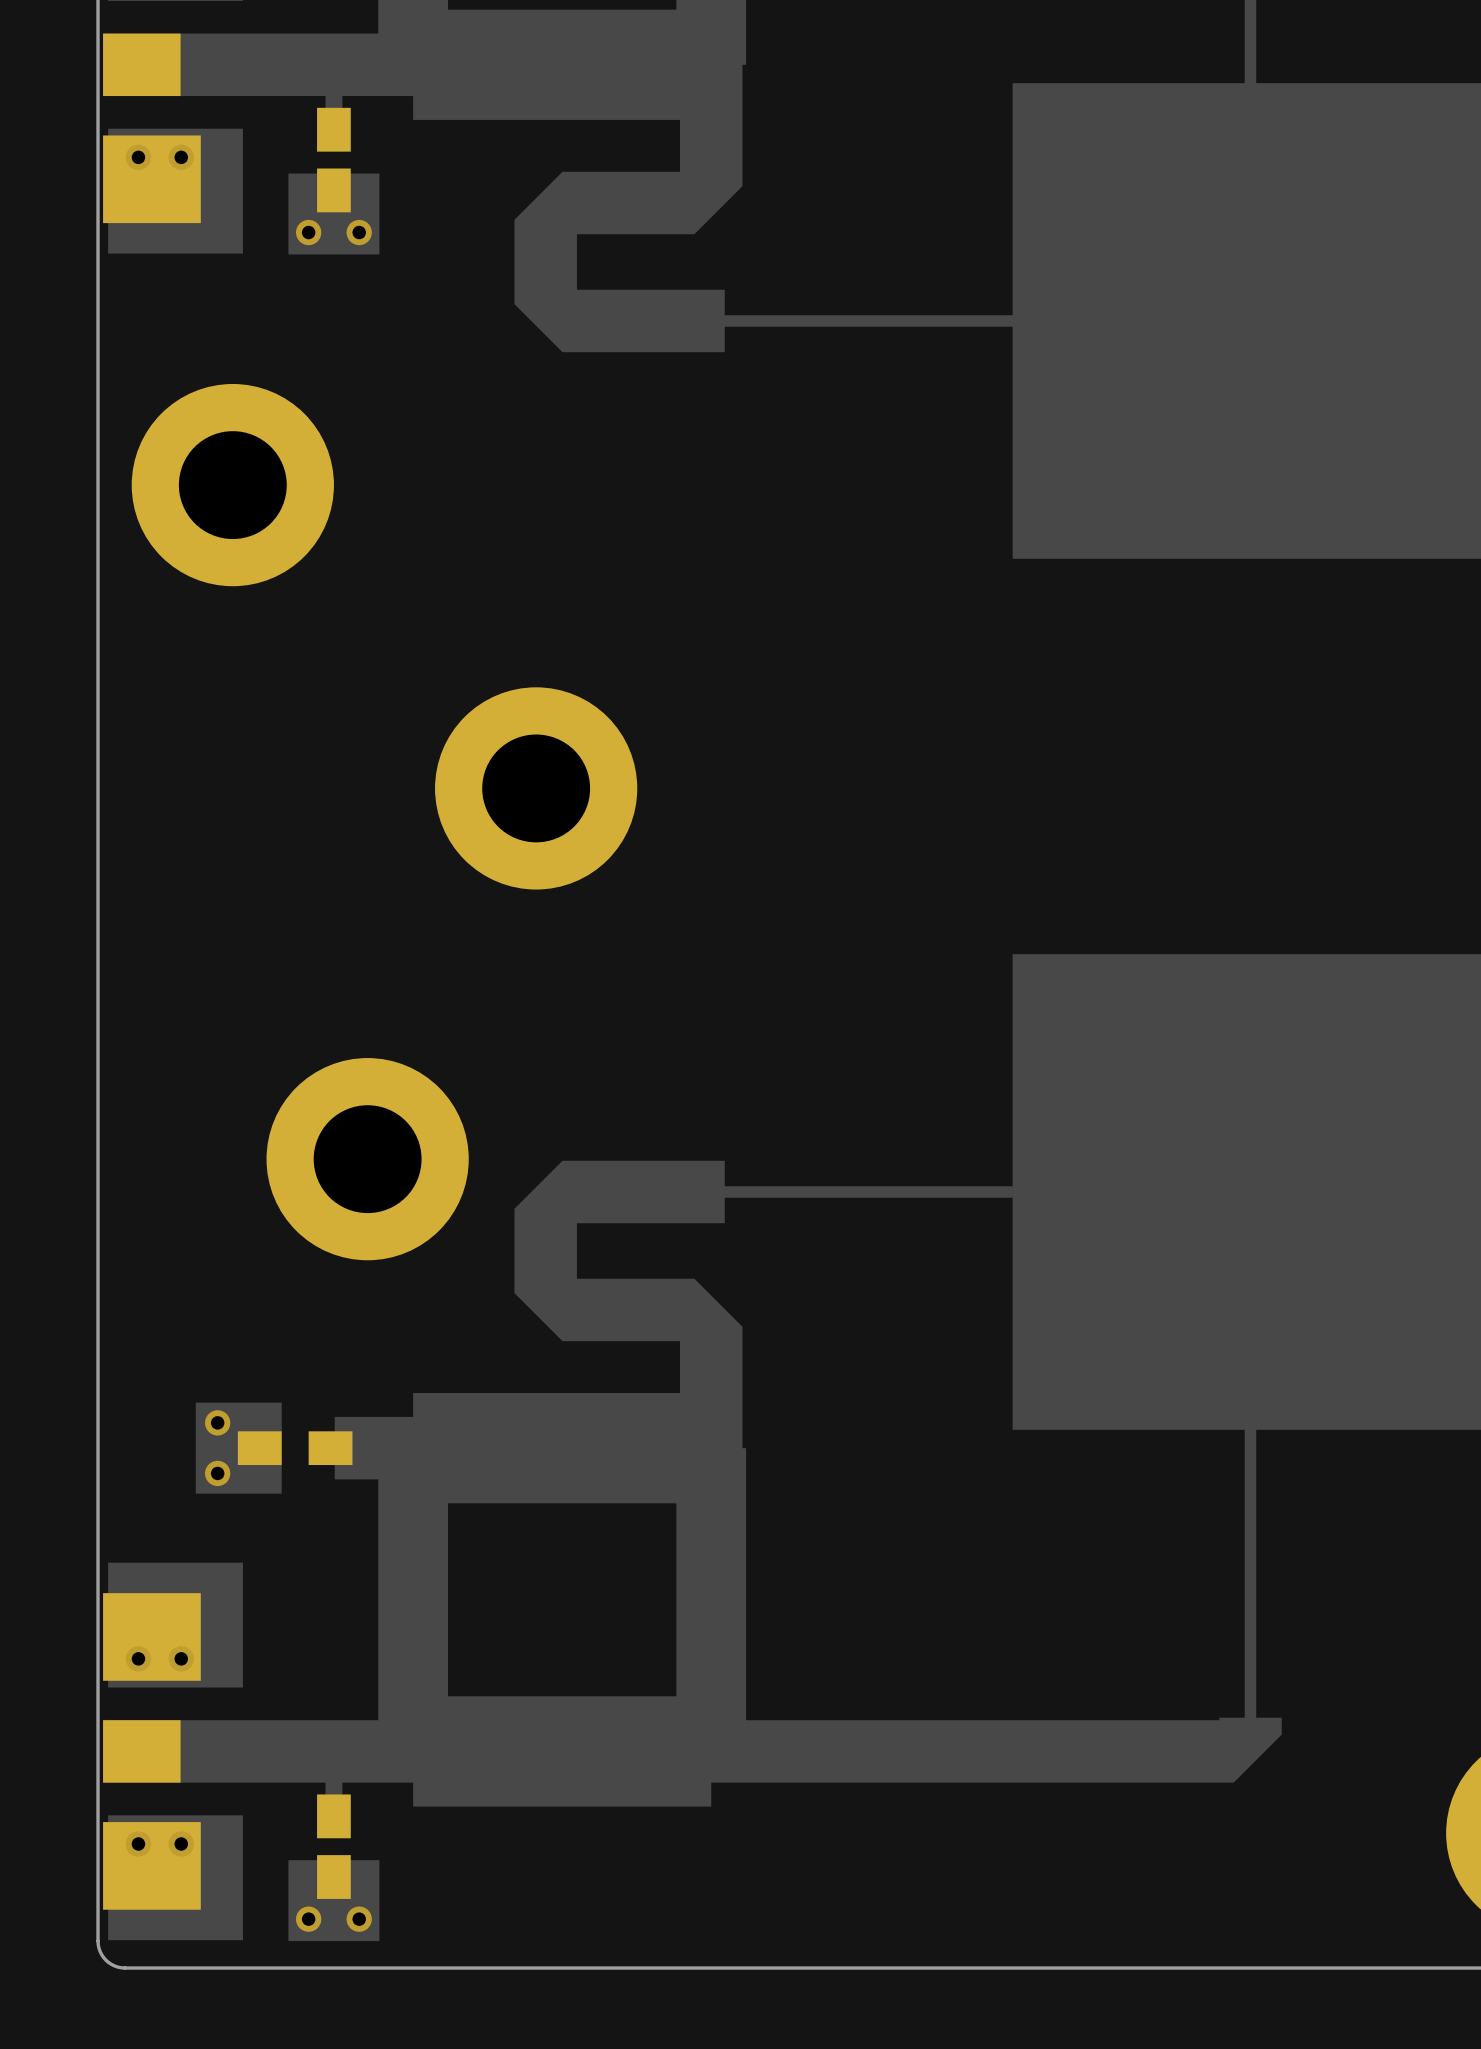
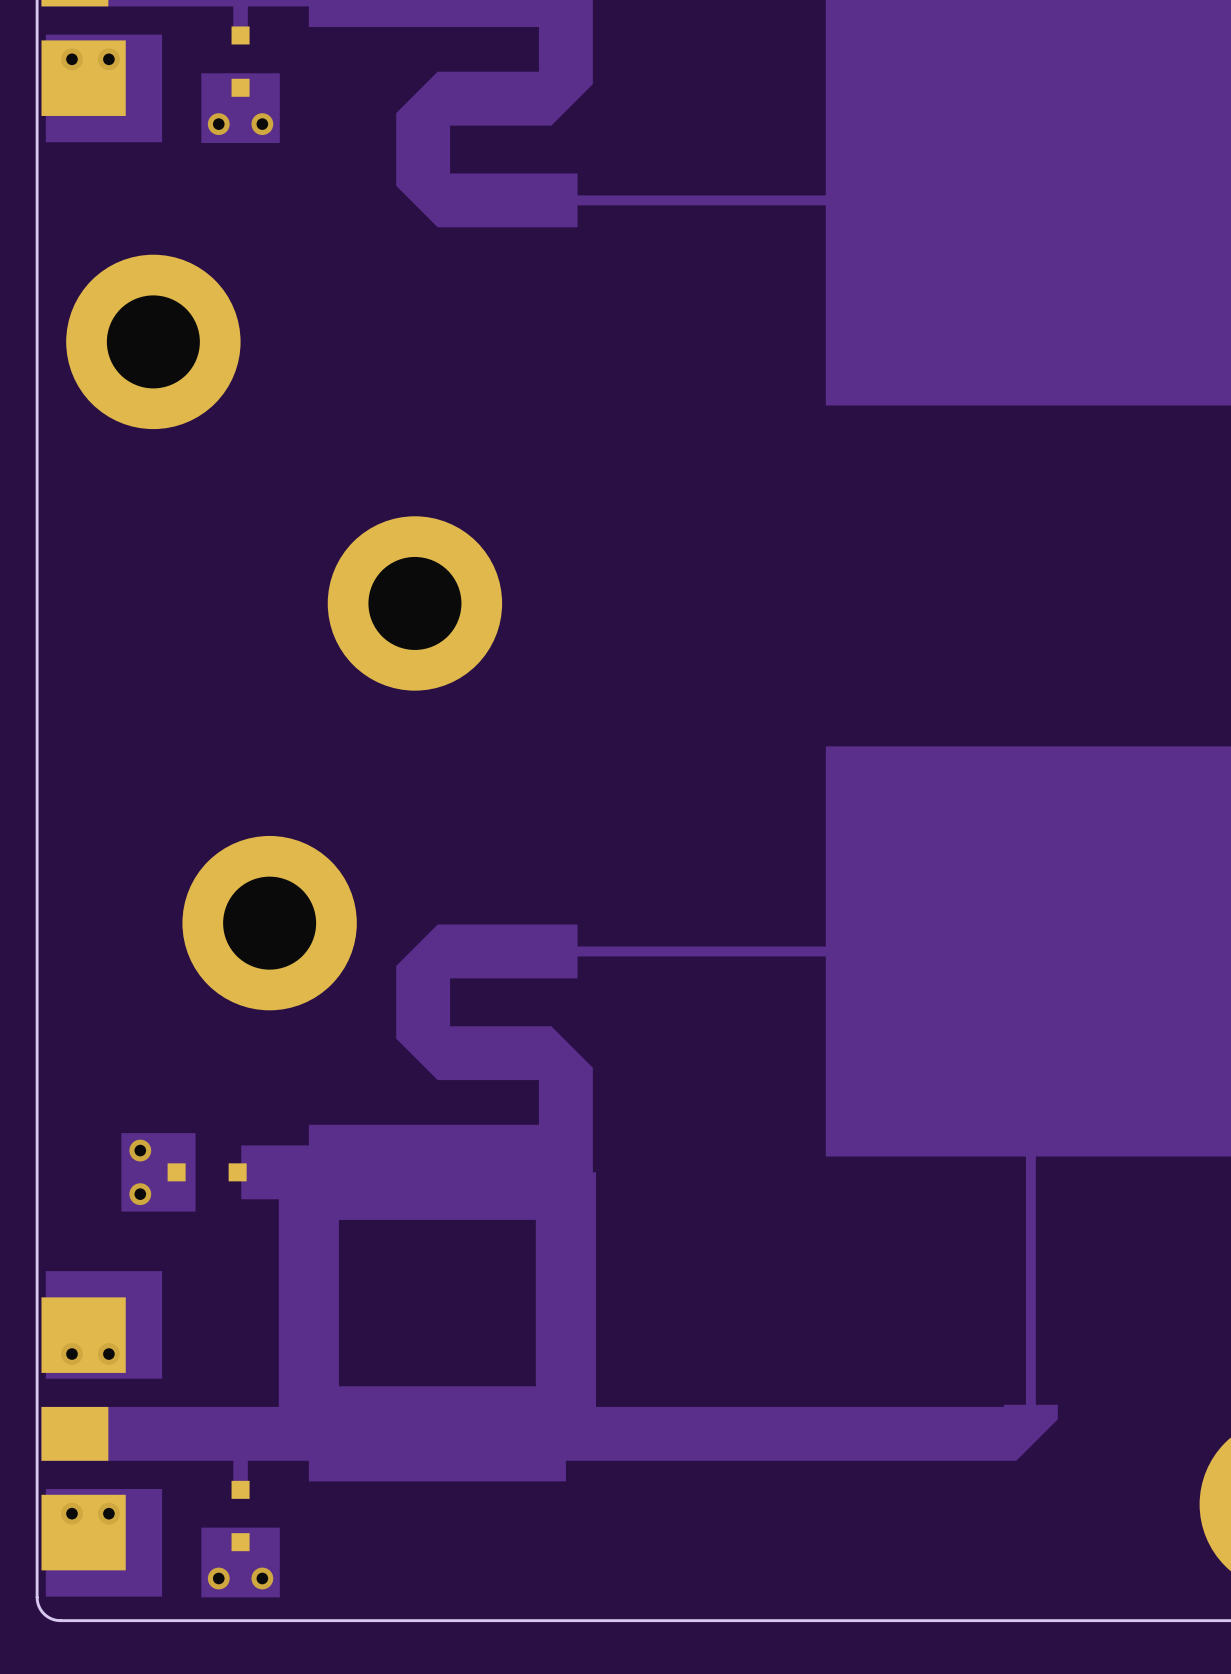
part footprint: [317, 107, 351, 213] -> [231, 26, 250, 97]
part footprint: [237, 1431, 353, 1466] -> [167, 1163, 247, 1182]
part footprint: [317, 1794, 351, 1899] -> [231, 1480, 250, 1552]

